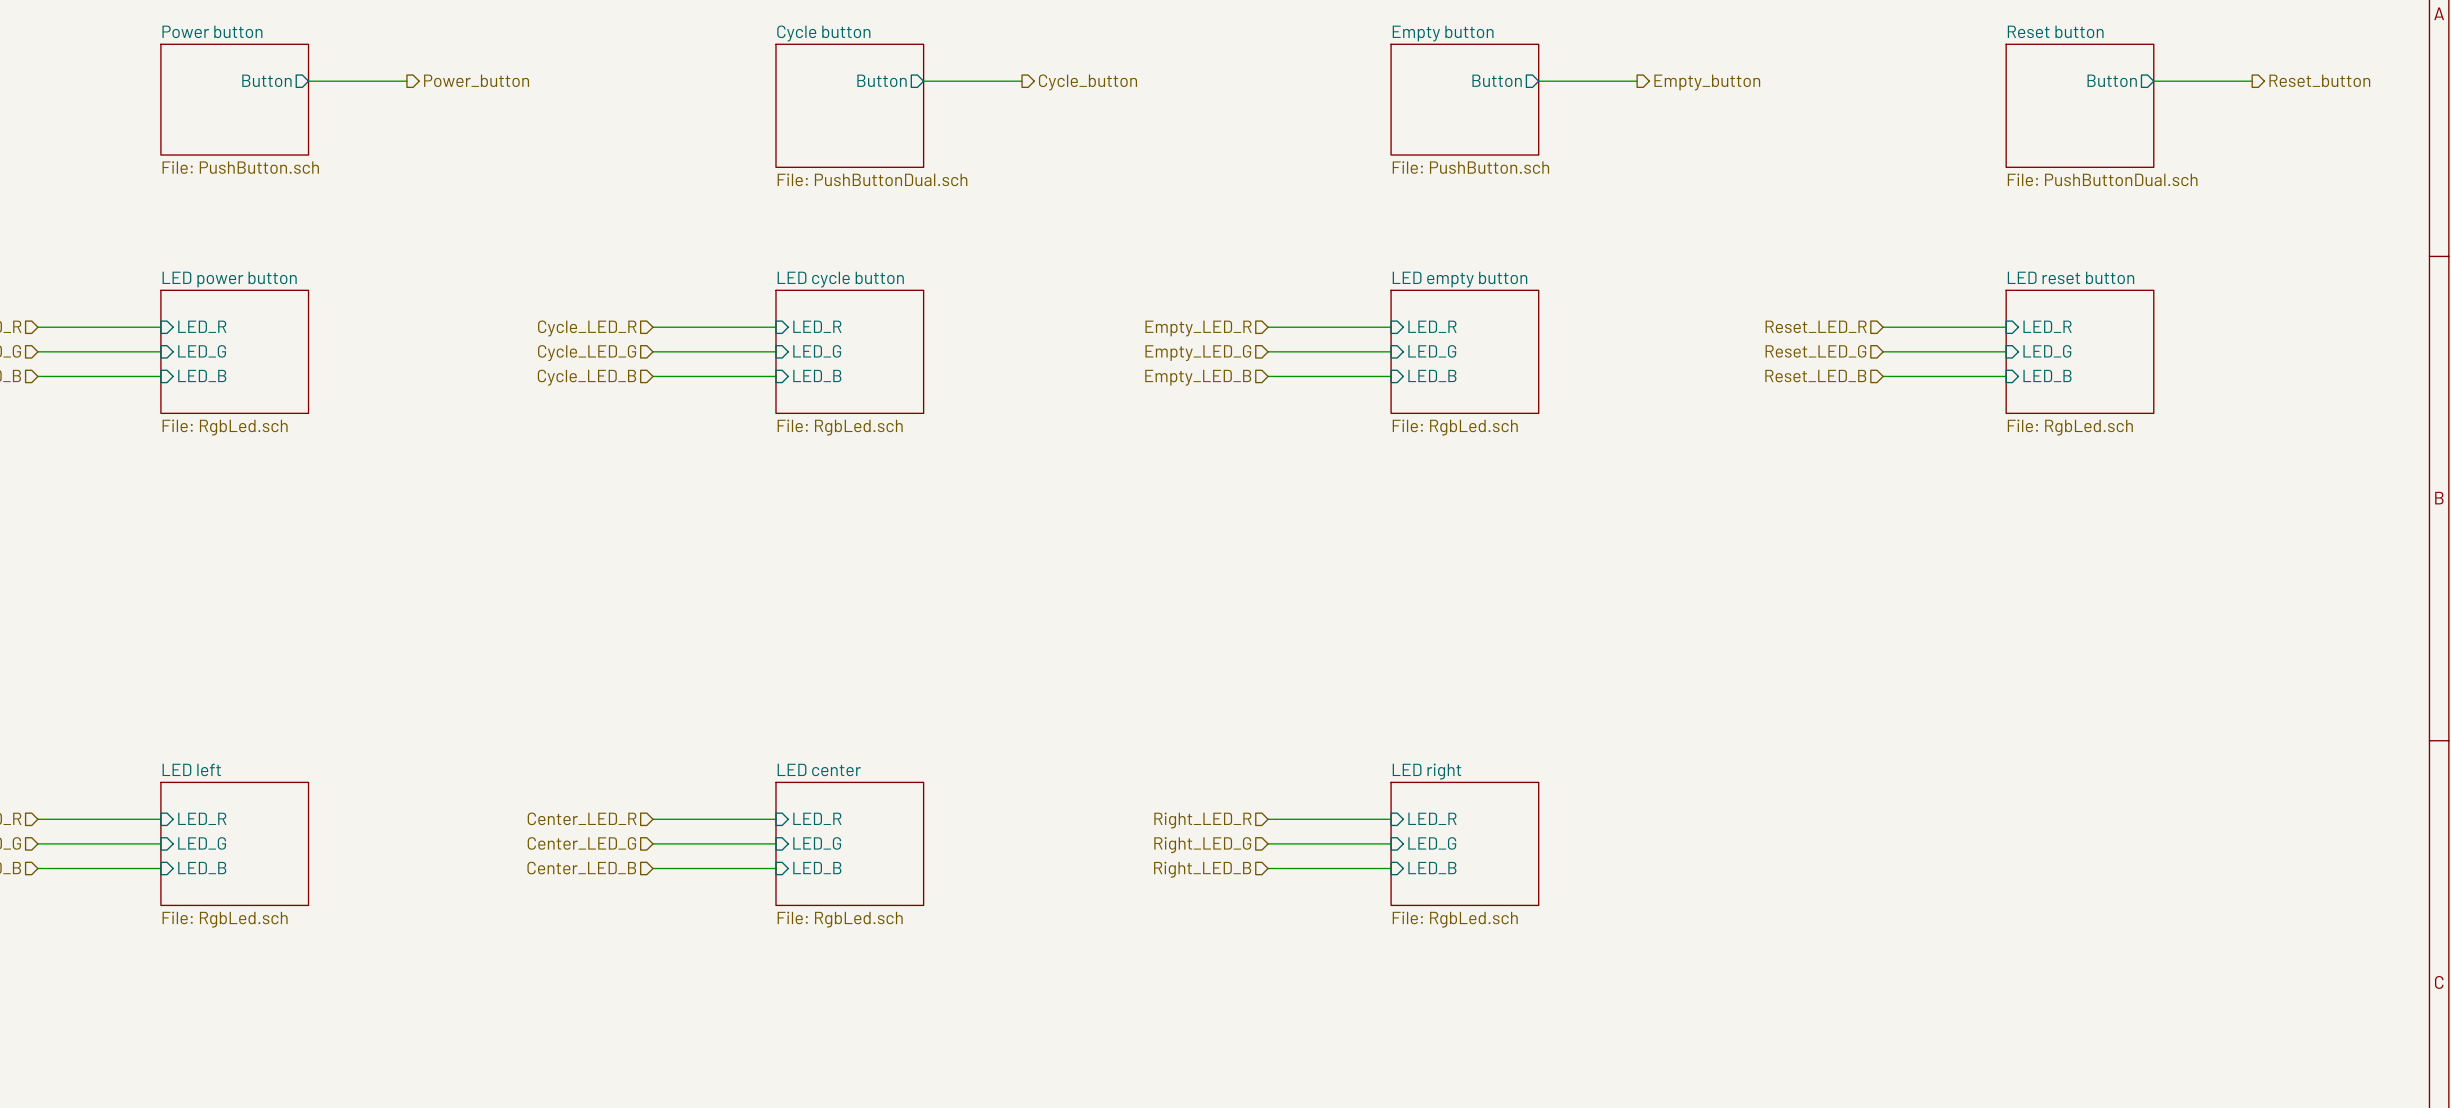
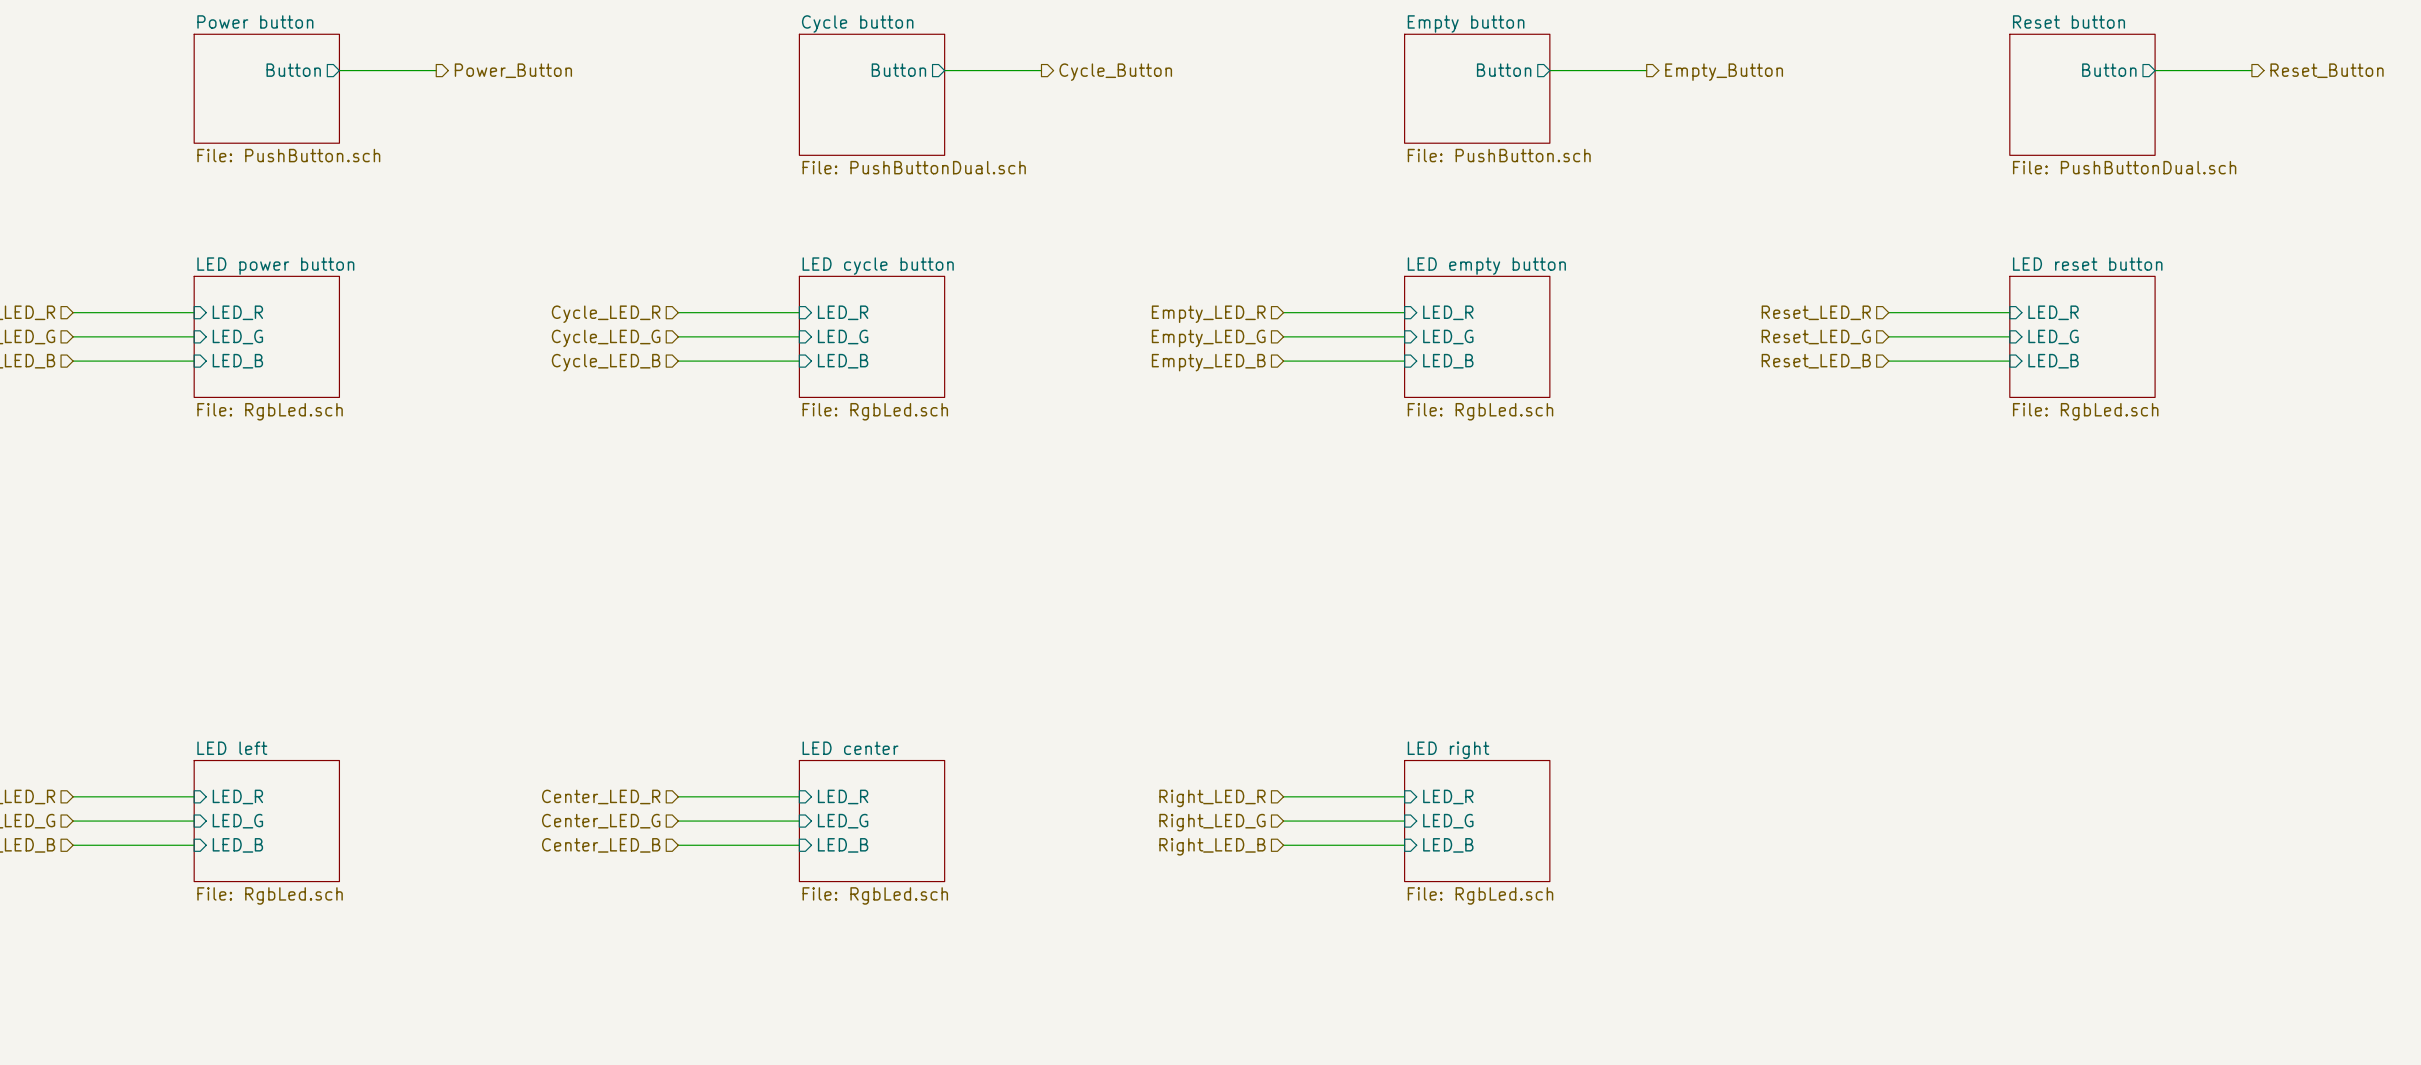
hierarchical label: Power_button (476, 80) -> Power_Button (513, 70)
hierarchical label: Reset_button (2319, 80) -> Reset_Button (2327, 70)
hierarchical label: Cycle_button (1087, 82) -> Cycle_Button (1115, 72)
hierarchical label: Empty_button (1707, 82) -> Empty_Button (1724, 72)

